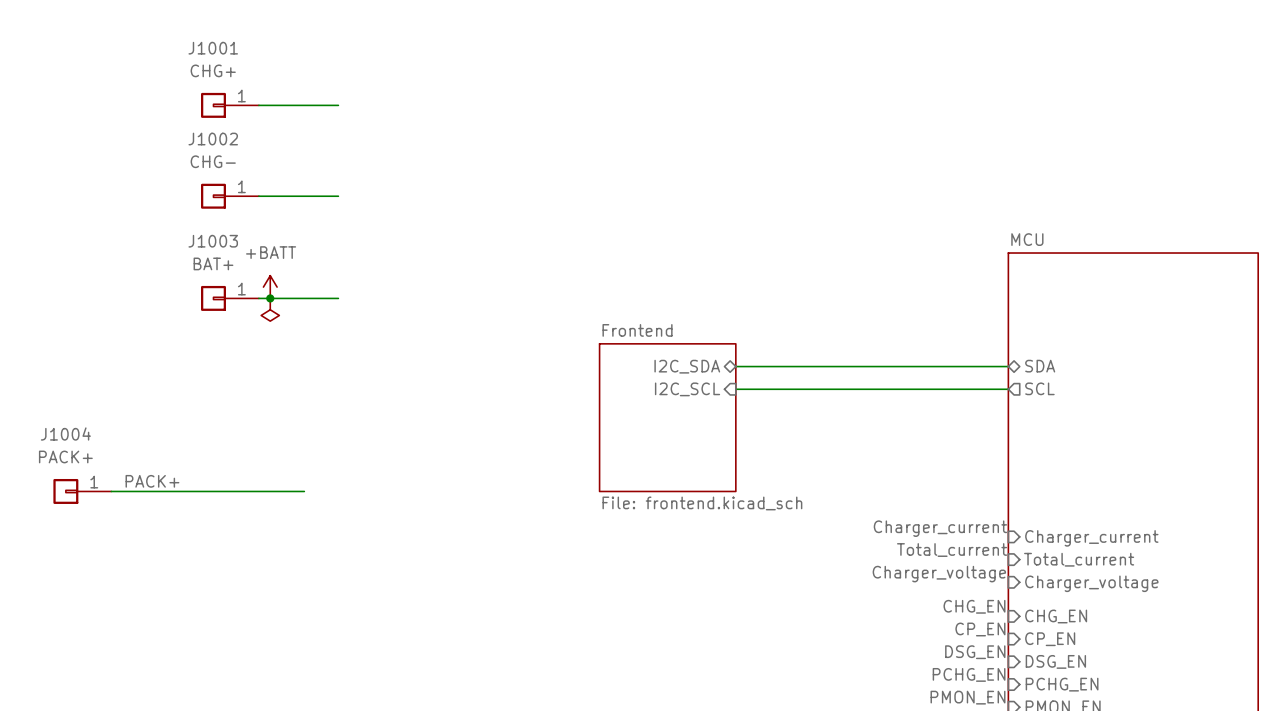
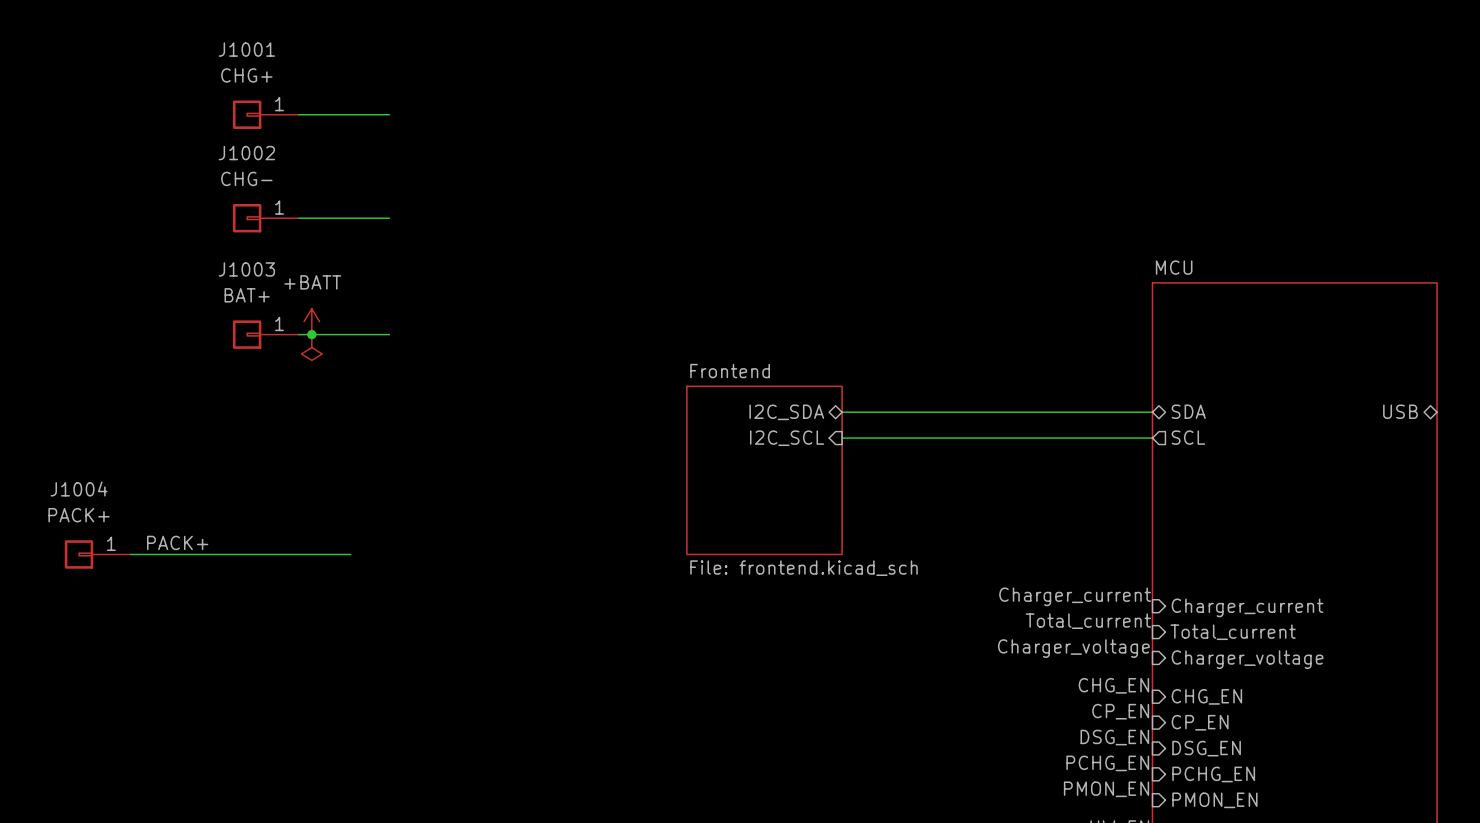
sheet pin: none -> USB (1400, 411)

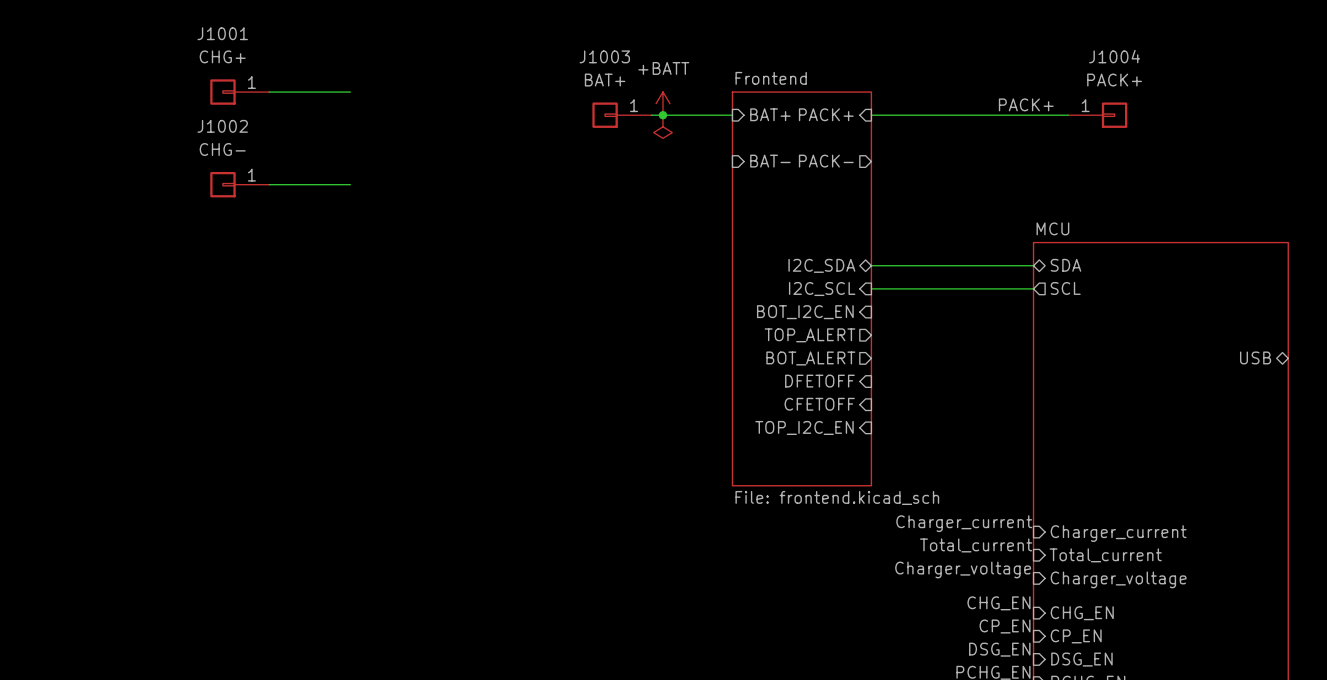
power symbol: none -> +BATT (662, 103)
label: none -> PACK+ (1026, 104)
wire: none -> (651, 115) (732, 115)
junction: none -> (662, 115)
sheet pin: none -> BAT+ (770, 114)
sheet pin: none -> PACK+ (826, 114)
wire: none -> (871, 115) (1068, 115)
power symbol: none -> (662, 126)
sheet pin: none -> BAT- (770, 161)
sheet pin: none -> PACK- (826, 161)
wire: none -> (871, 265) (1033, 265)
power symbol: +BATT (311, 321) -> none
J1003 position: (265, 334) -> (621, 115)
wire: (298, 334) (389, 334) -> none
junction: (311, 334) -> none
sheet Frontend: none -> File: frontend.kicad_sch (801, 288)
wire: none -> (871, 288) (1033, 288)
power symbol: (311, 347) -> none
sheet pin: none -> BOT_I2C_EN (805, 312)
sheet pin: none -> TOP_ALERT (810, 335)
sheet pin position: SDA (1188, 411) -> SDA (1065, 265)
sheet pin position: I2C_SDA (786, 412) -> I2C_SDA (821, 265)
wire: (842, 412) (1152, 412) -> none
sheet pin: none -> BOT_ALERT (810, 358)
sheet pin: none -> DFETOFF (819, 381)
sheet pin position: SCL (1188, 437) -> SCL (1065, 288)
sheet pin position: I2C_SCL (787, 438) -> I2C_SCL (822, 289)
wire: (842, 438) (1152, 438) -> none
sheet pin: none -> CFETOFF (819, 404)
sheet Frontend: File: frontend.kicad_sch (764, 470) -> none
J1004 name position: J1004 (79, 489) -> J1004 (1114, 56)
sheet pin: none -> TOP_I2C_EN (804, 427)
J1004 value position: PACK+ (79, 515) -> PACK+ (1114, 80)
label: PACK+ (177, 542) -> none
J1004 rotation: 0° (79, 554) -> 180° (1114, 115)
J1004 position: (97, 554) -> (1097, 115)
wire: (130, 554) (350, 554) -> none

